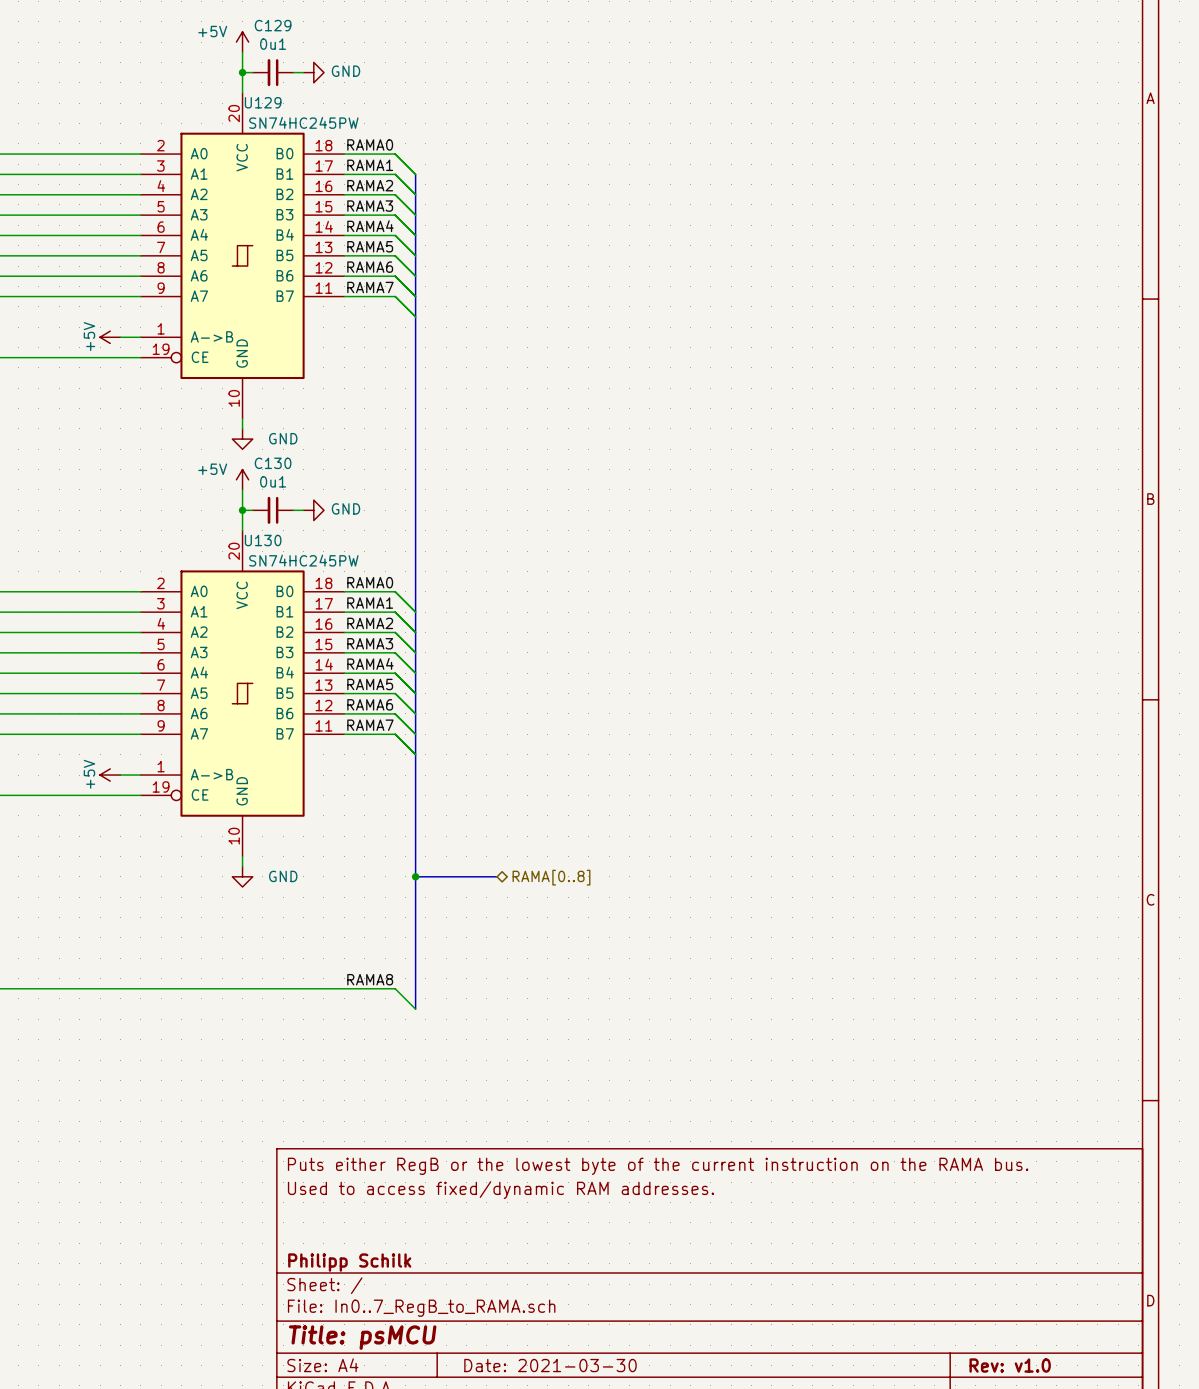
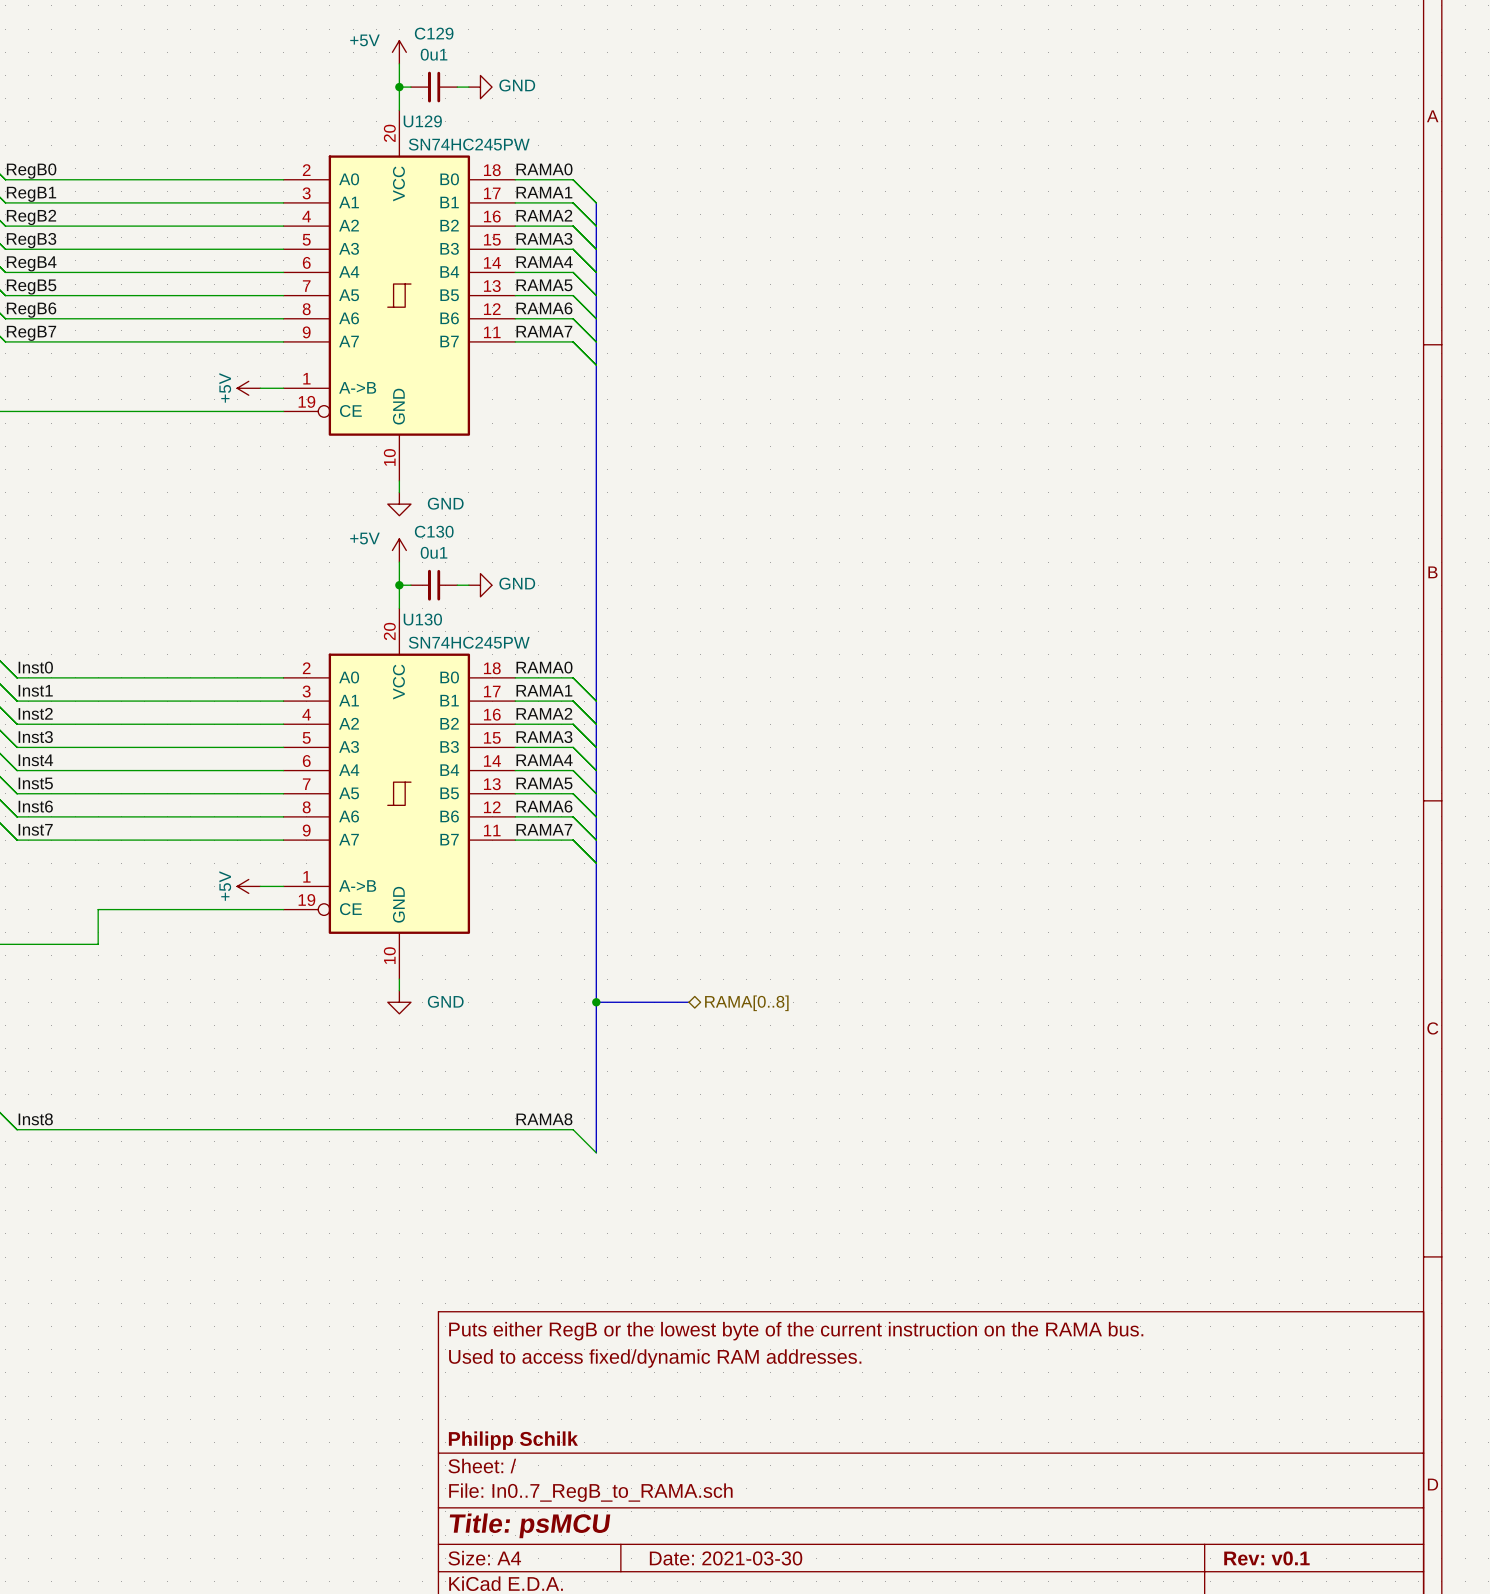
title block: Rev: v1.0 (1010, 1365) -> Rev: v0.1 (1266, 1558)

